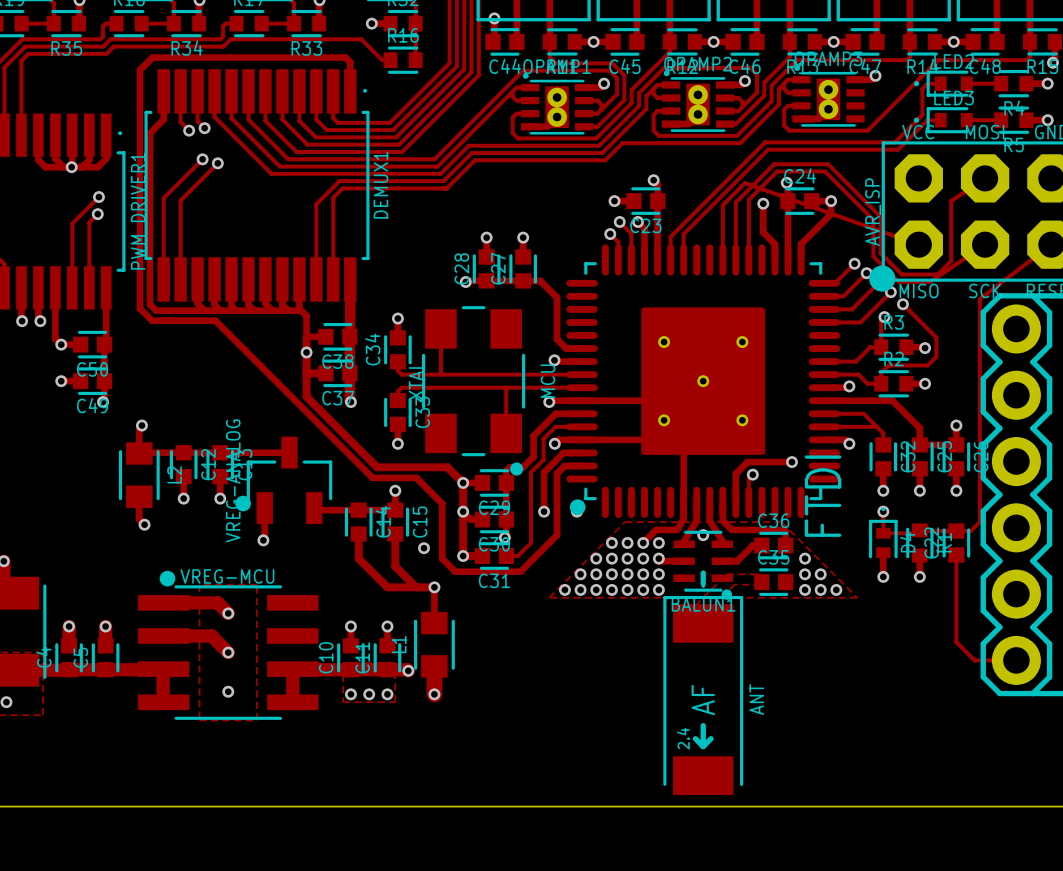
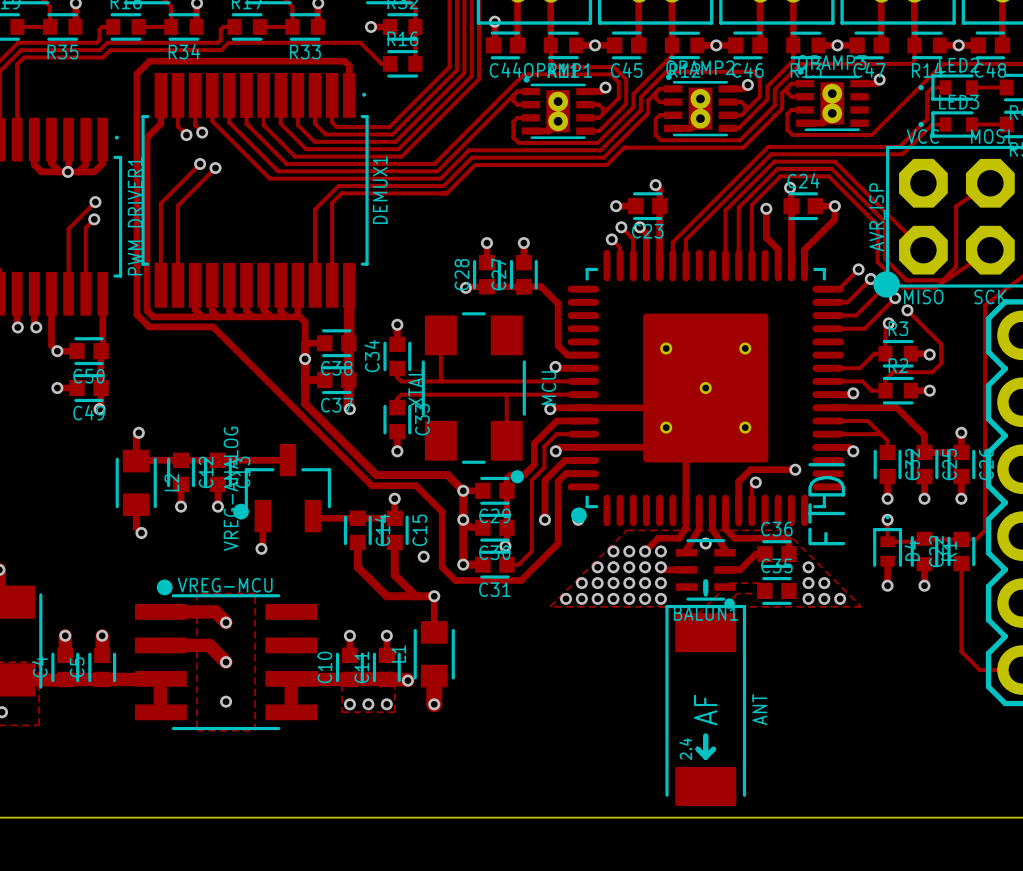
track: (744, 183) (918, 244) -> (747, 188) (774, 161) (834, 161) (923, 250)

